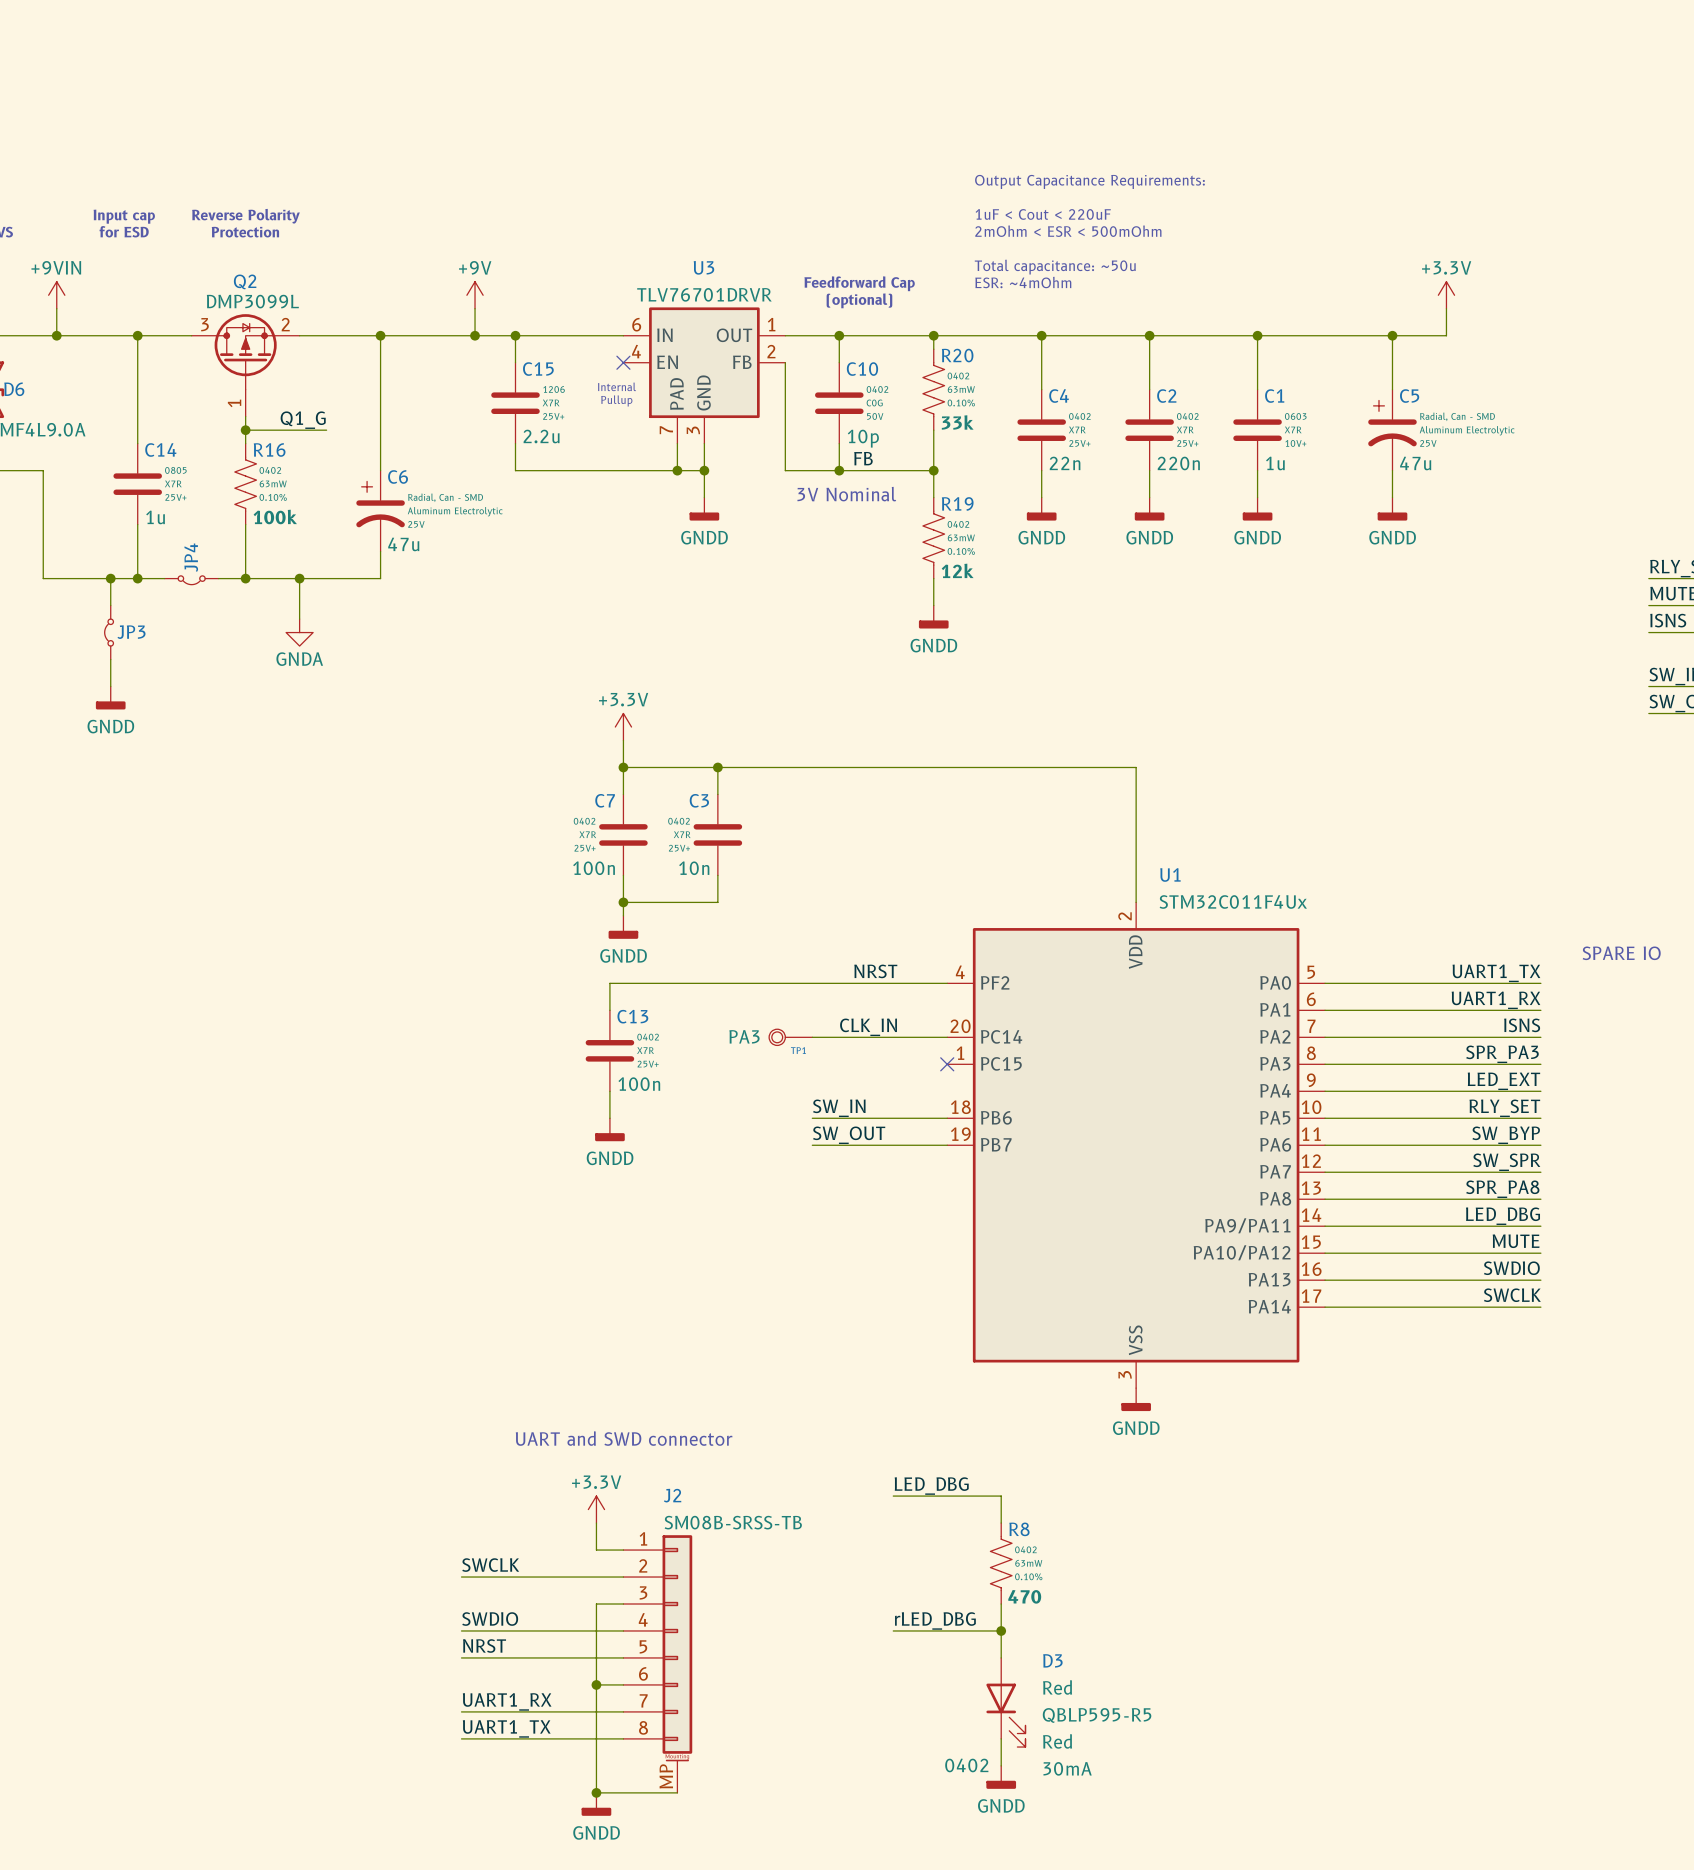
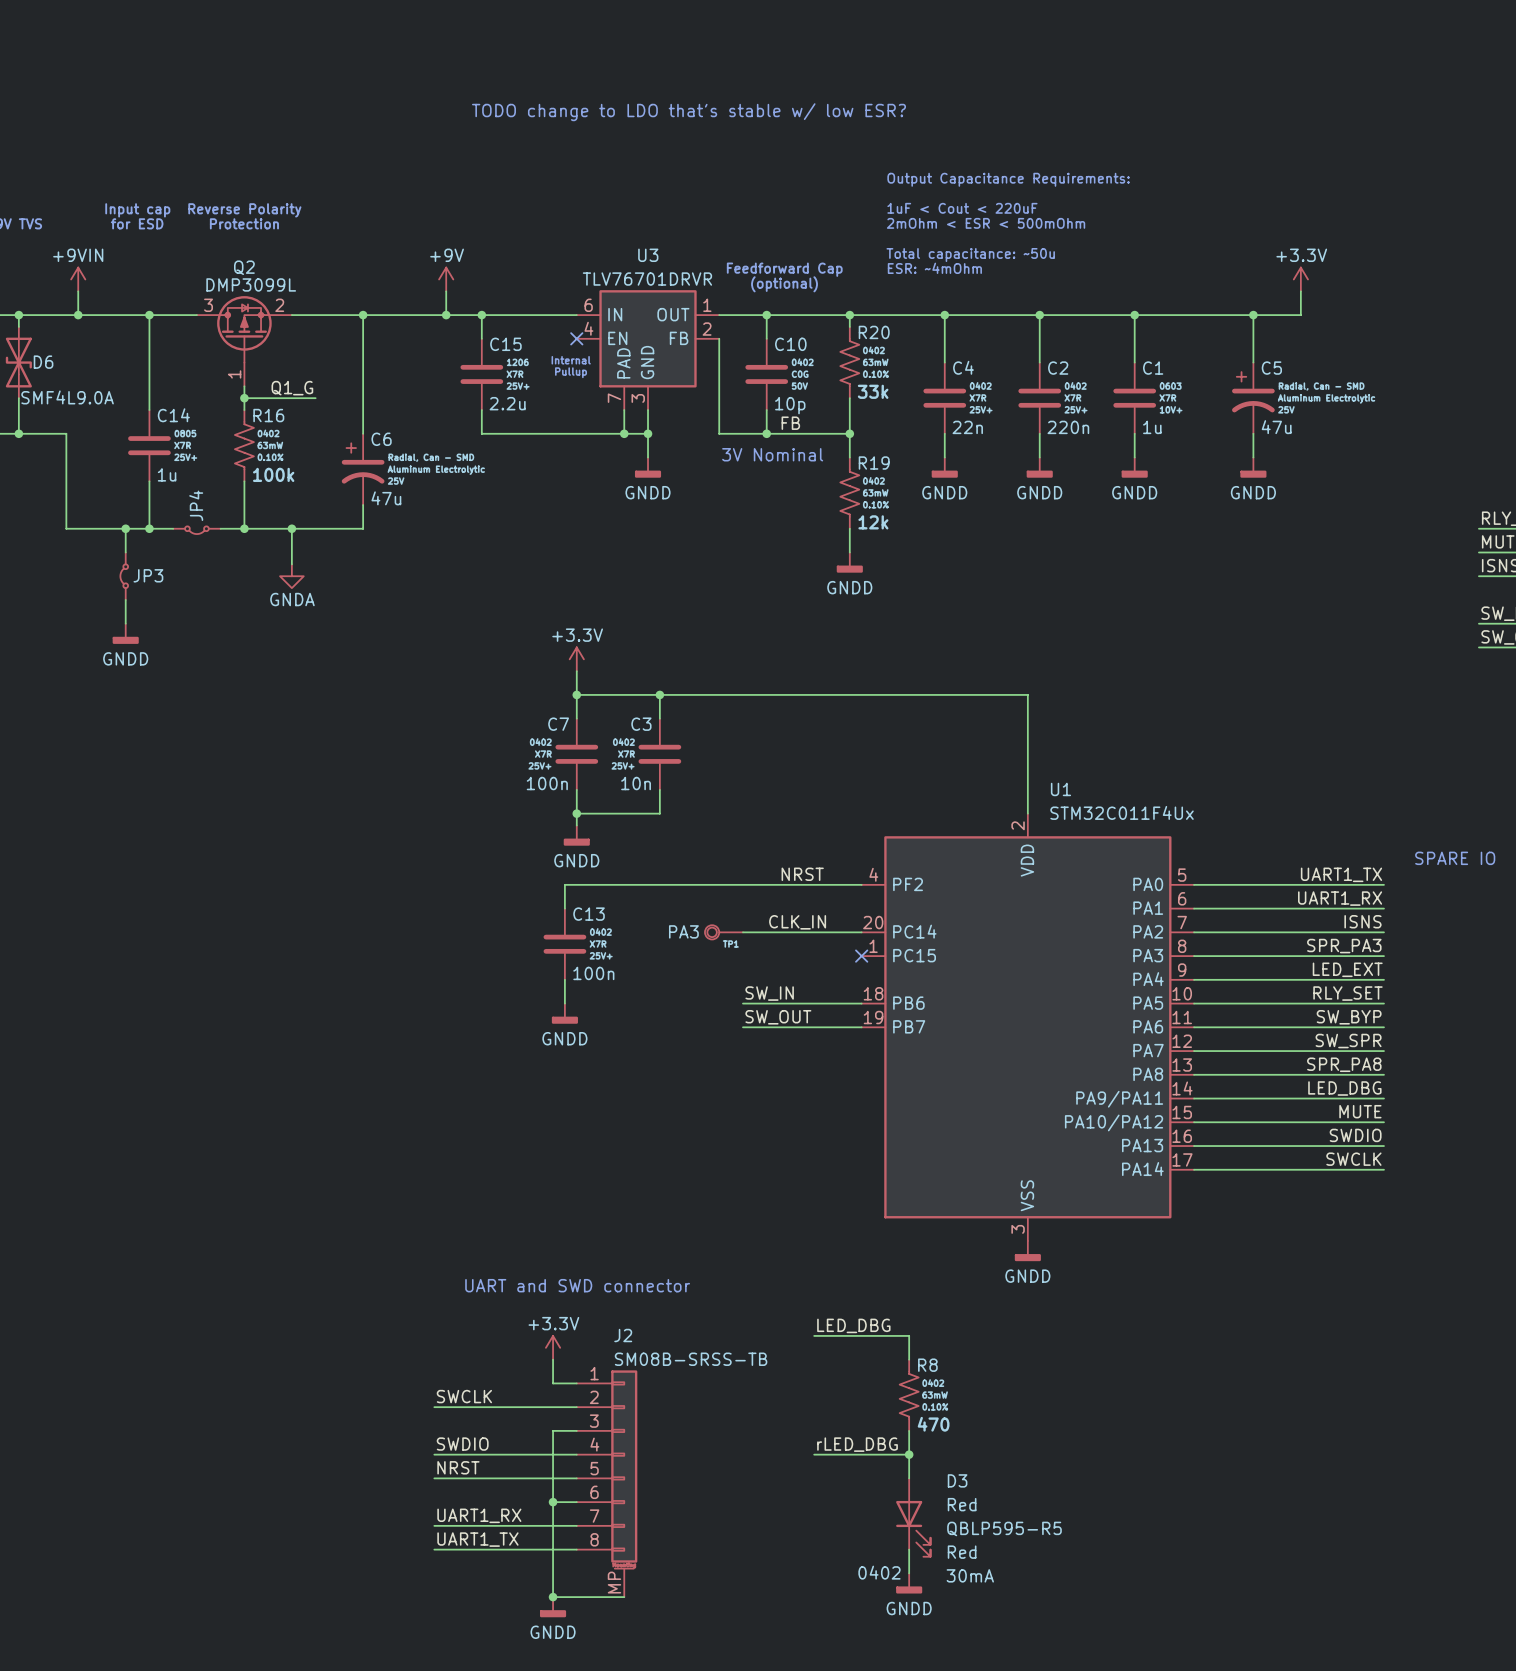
text: none -> TODO change to LDO that's stable w/ low ESR? (688, 112)

